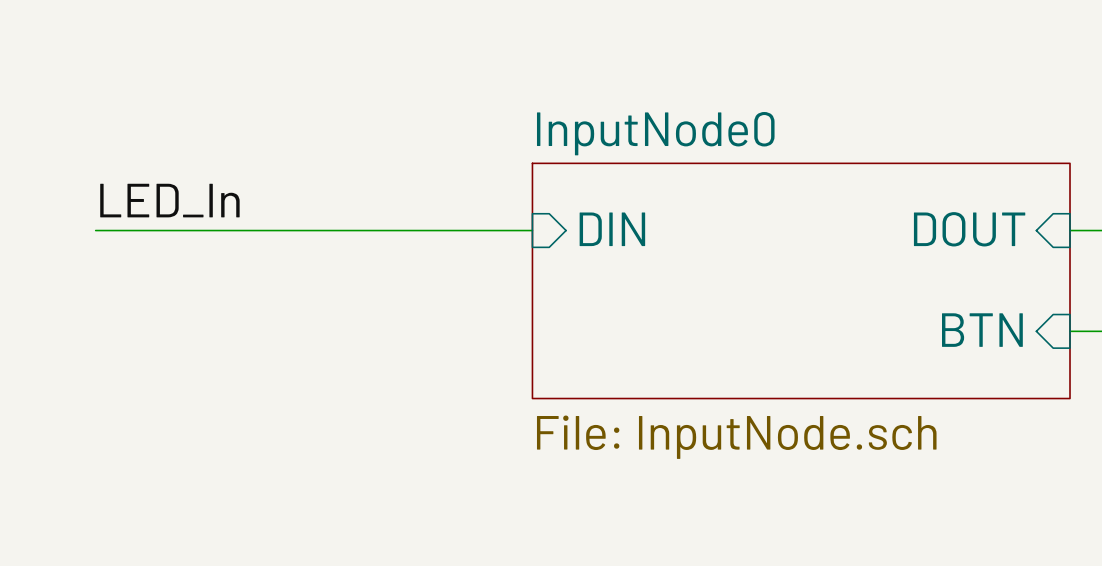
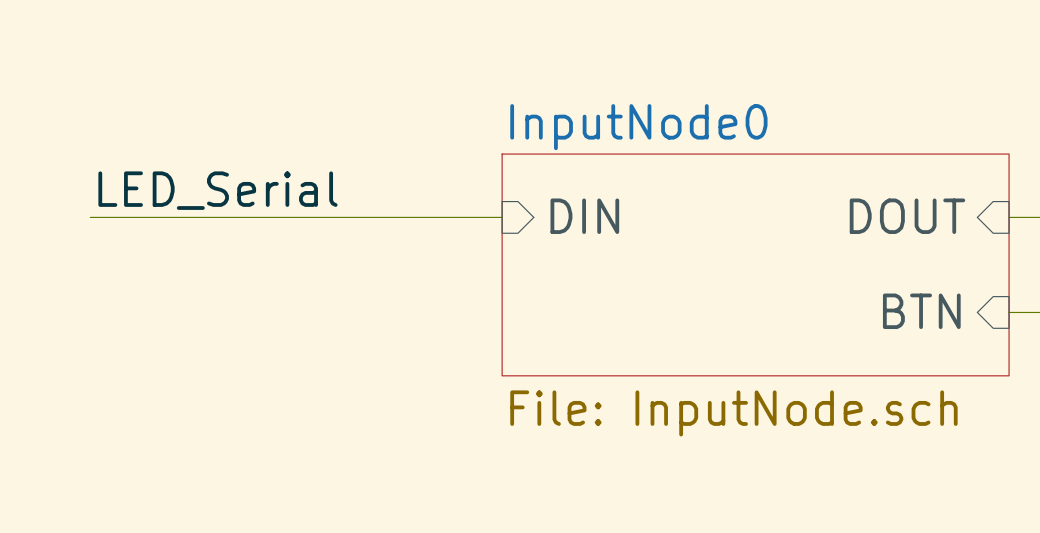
label: LED_In (169, 200) -> LED_Serial (217, 190)

